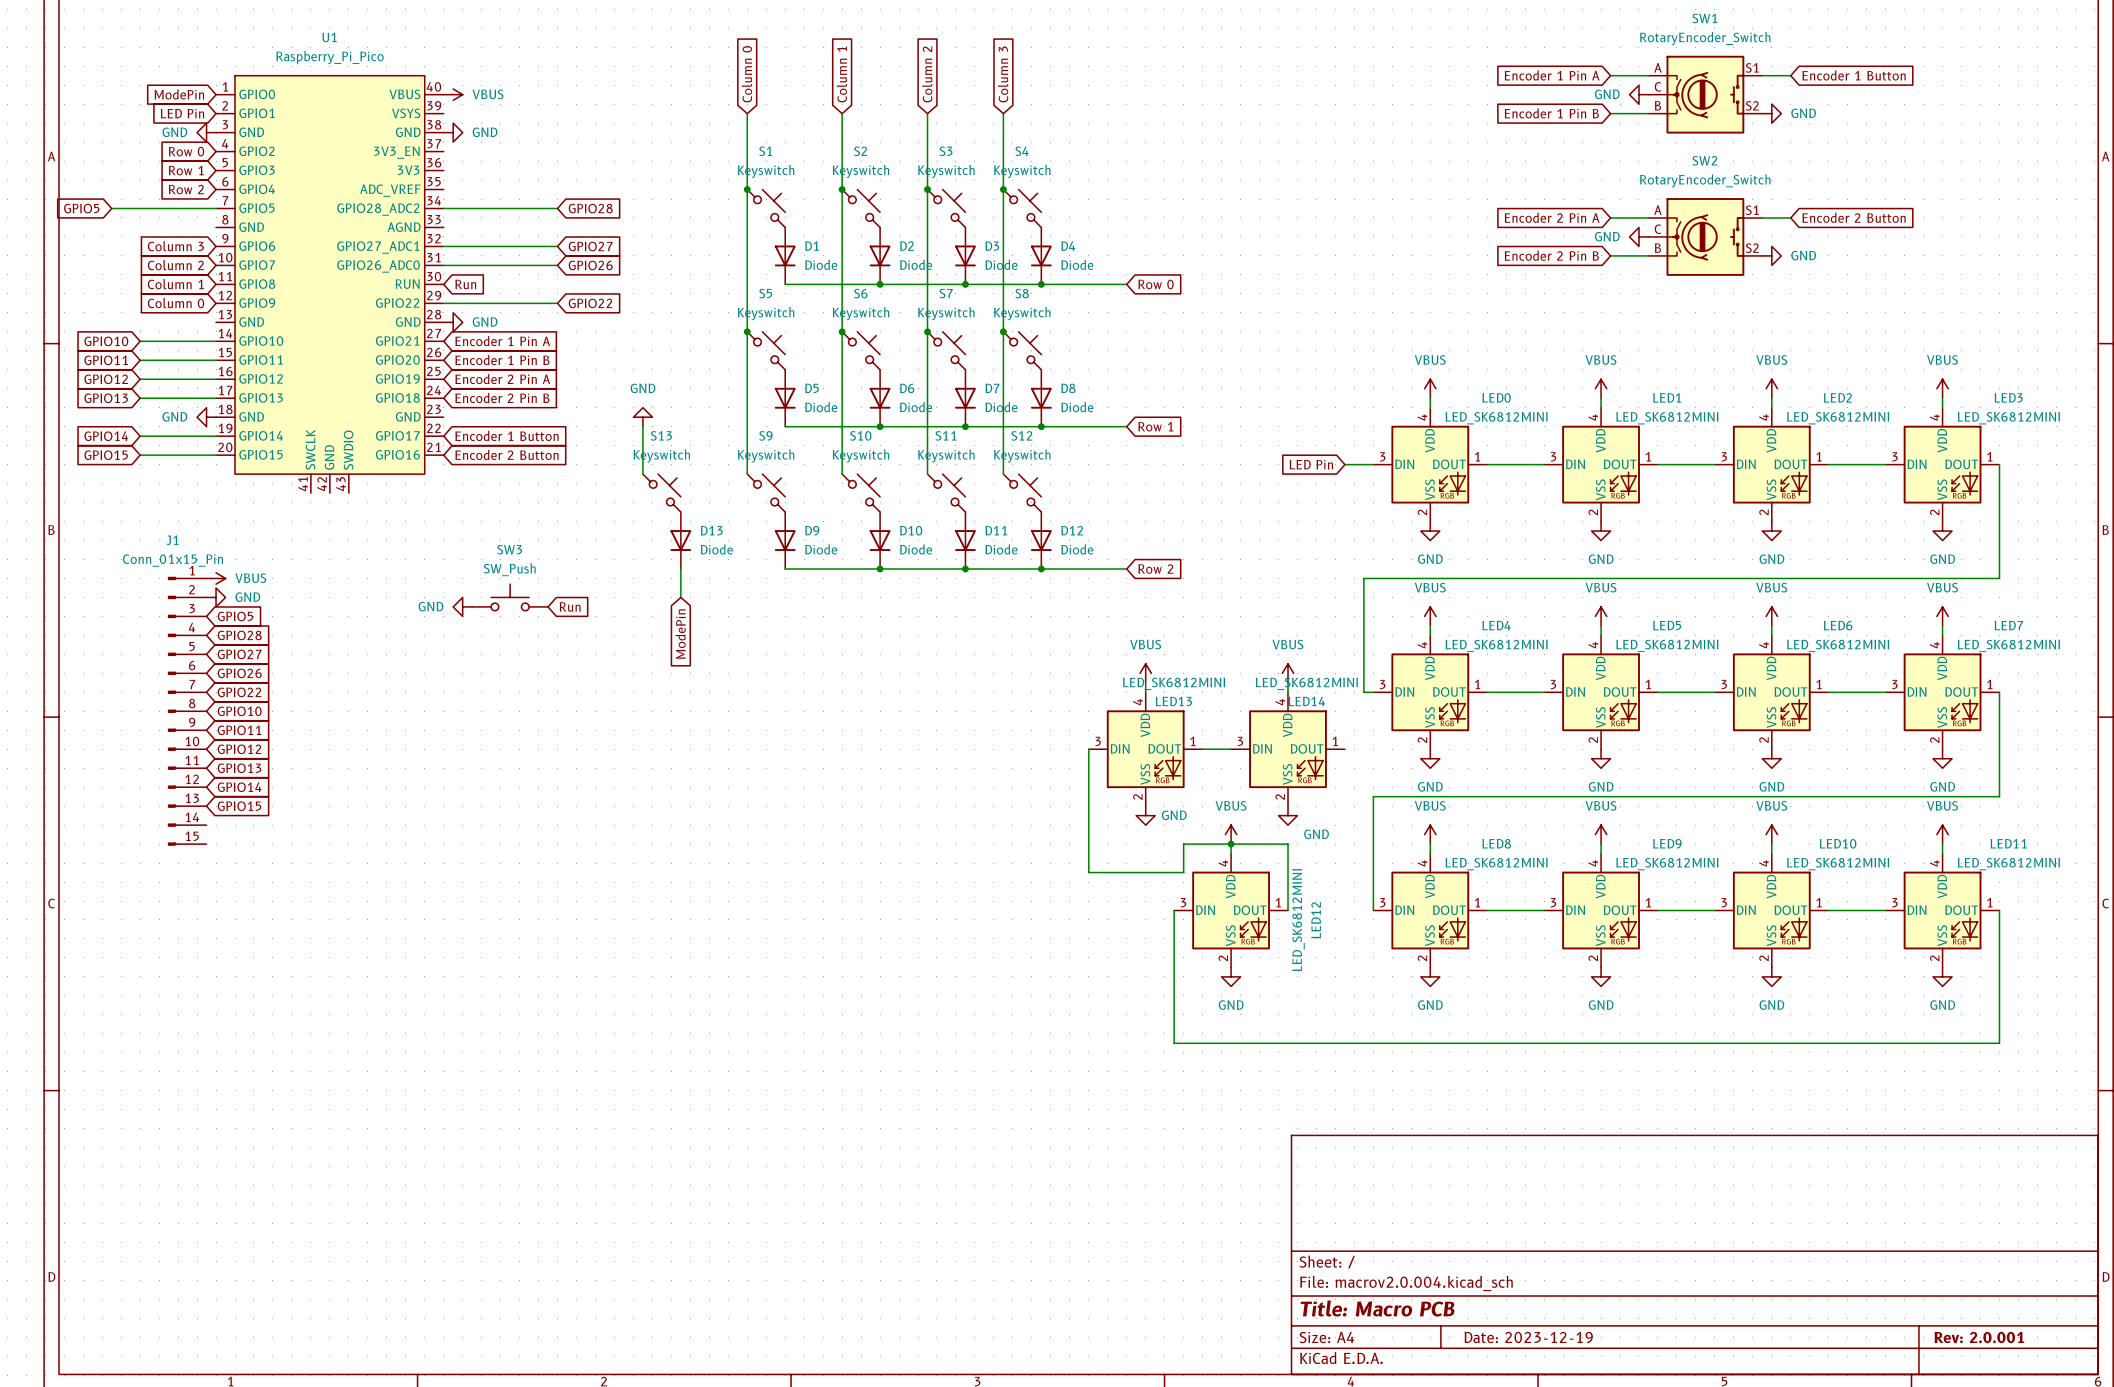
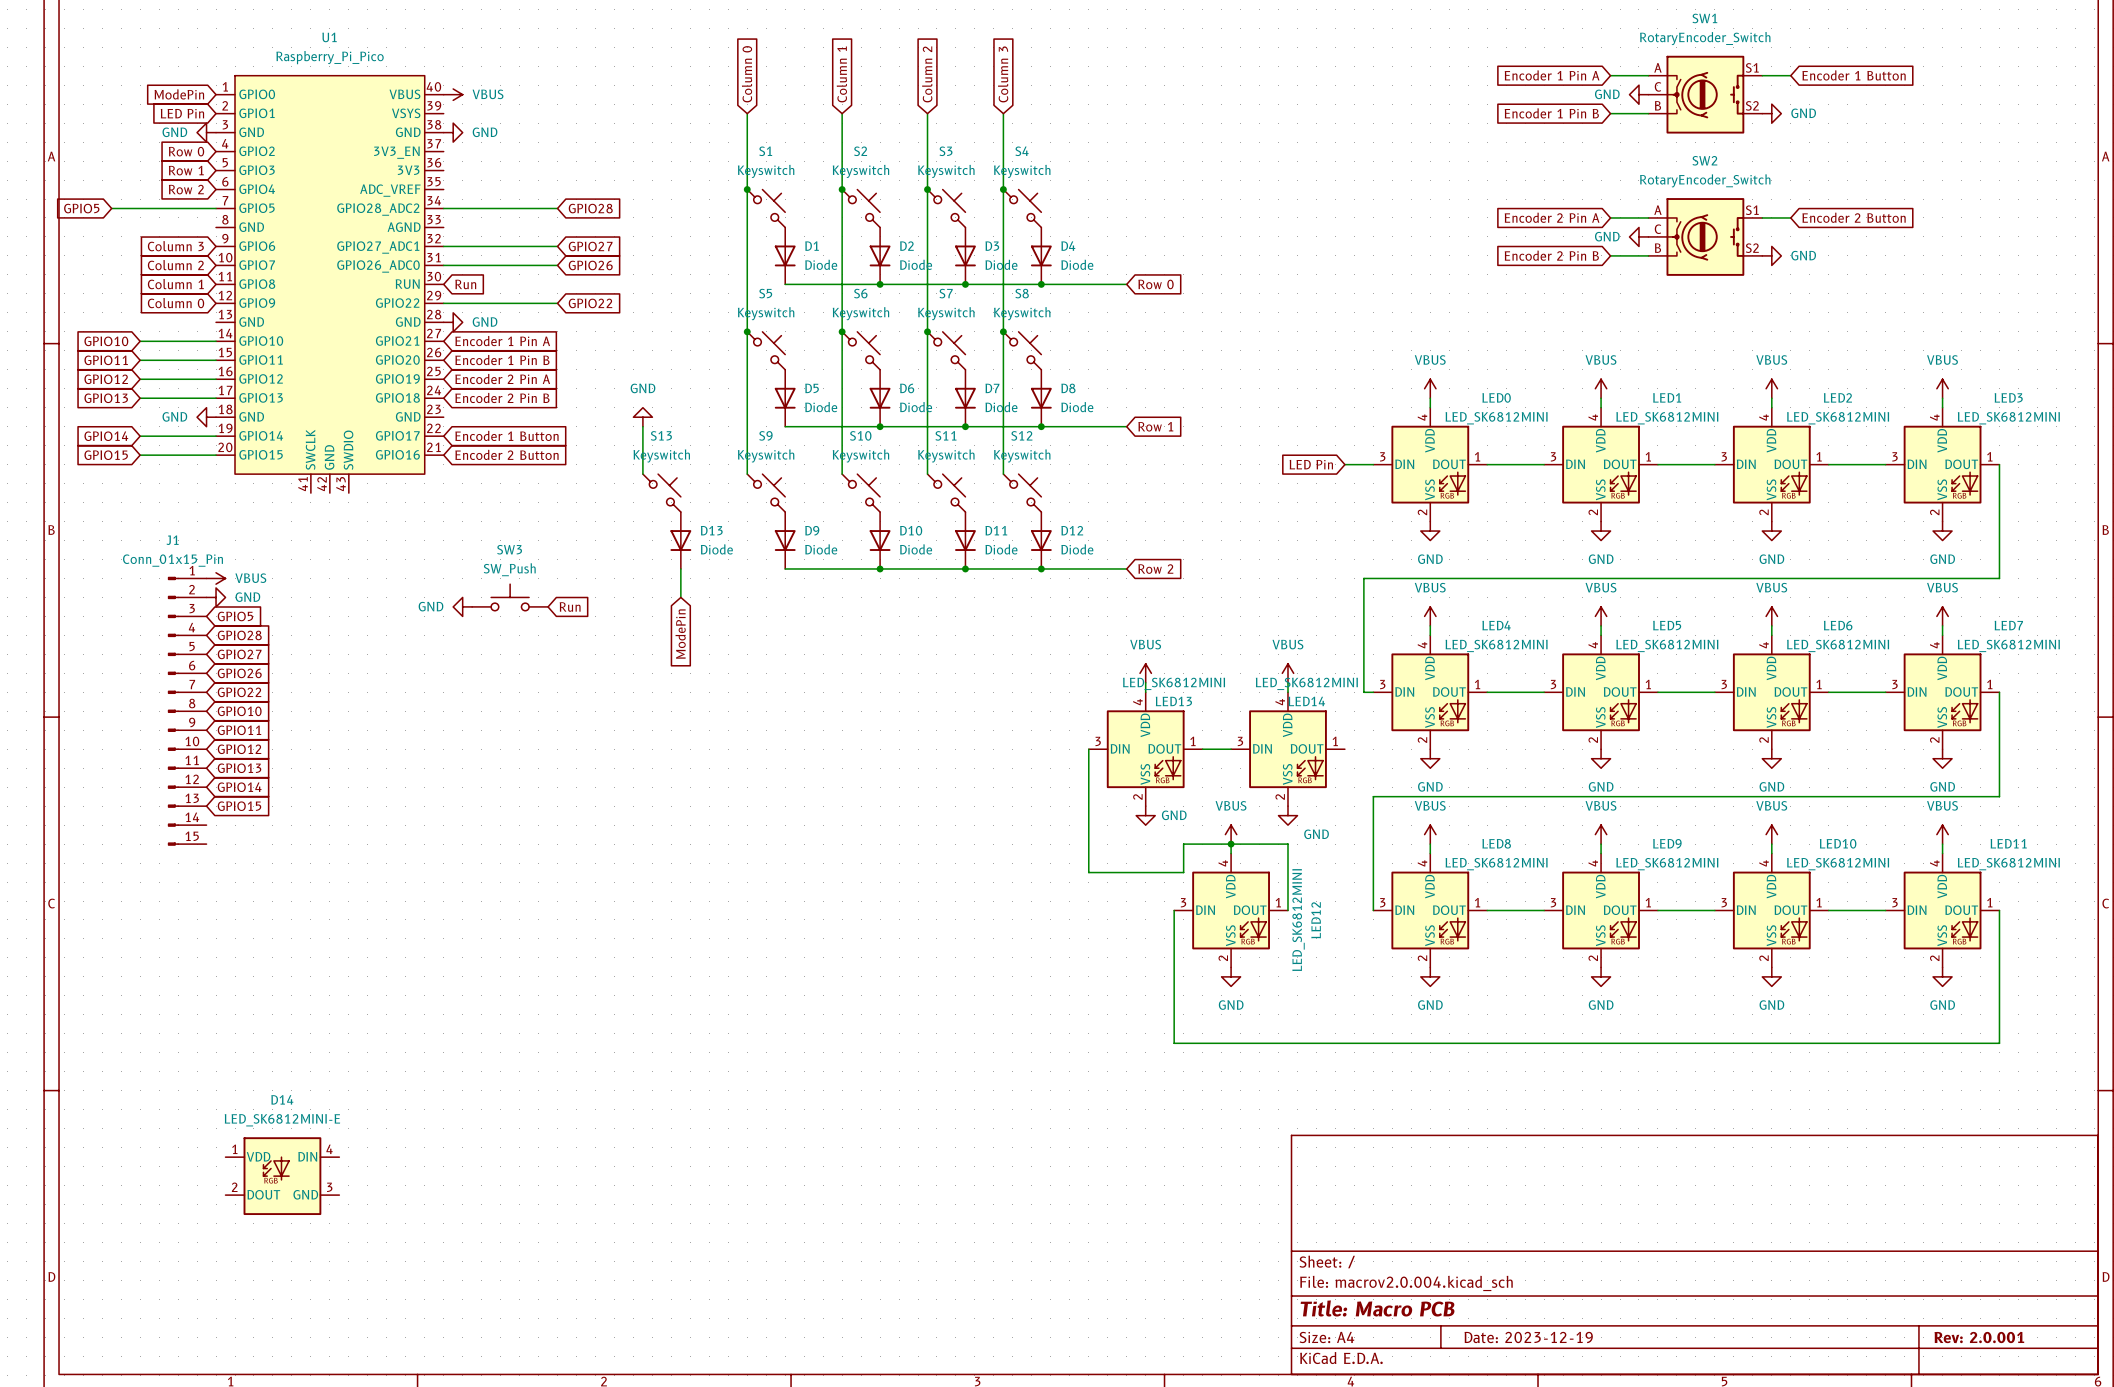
D14: none -> LED_SK6812MINI-E (282, 1176)

